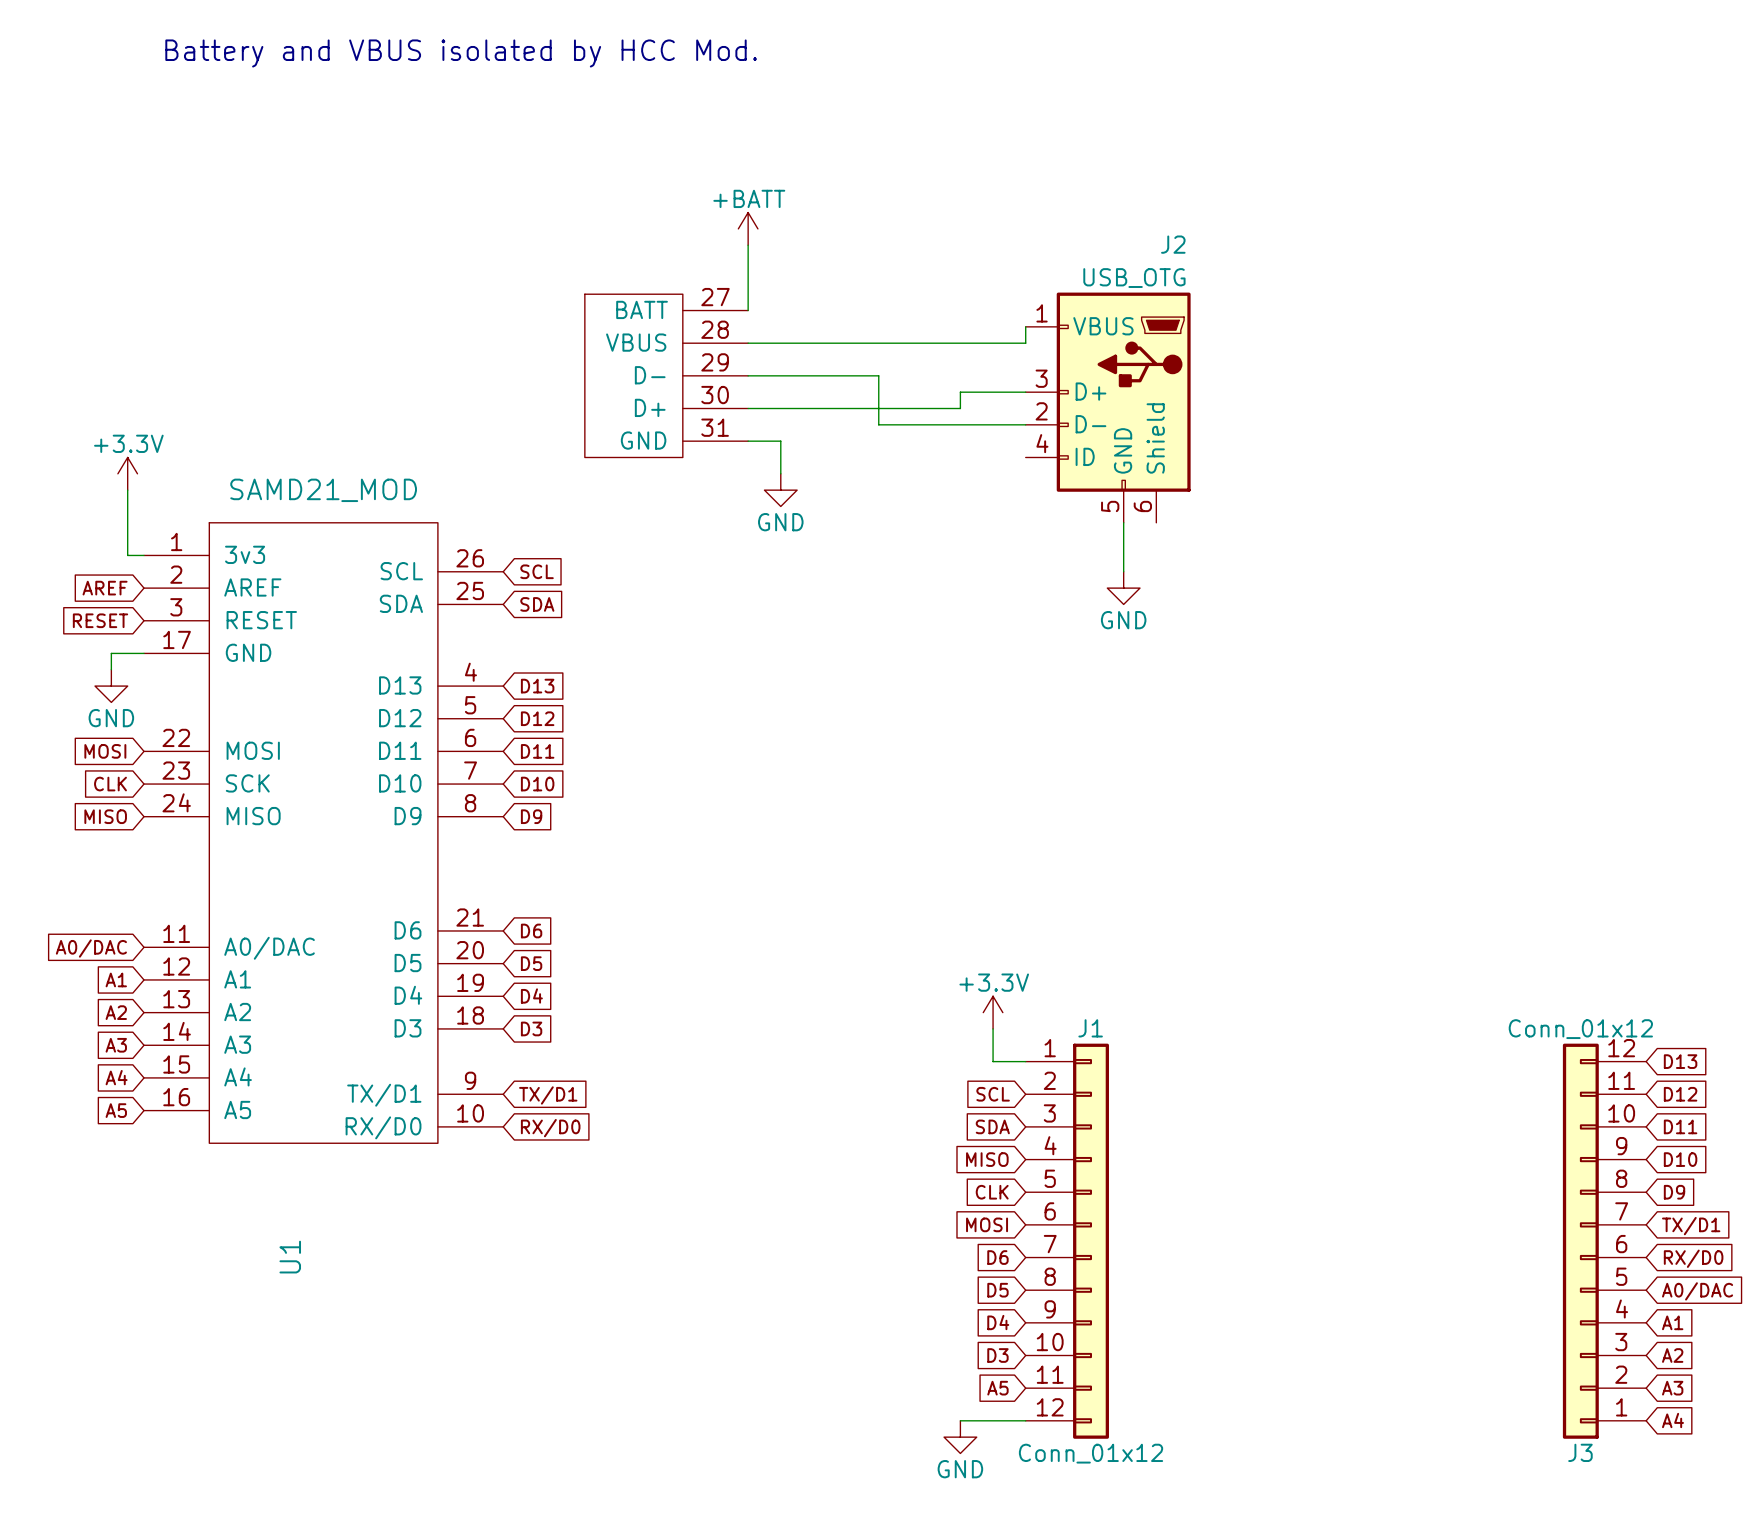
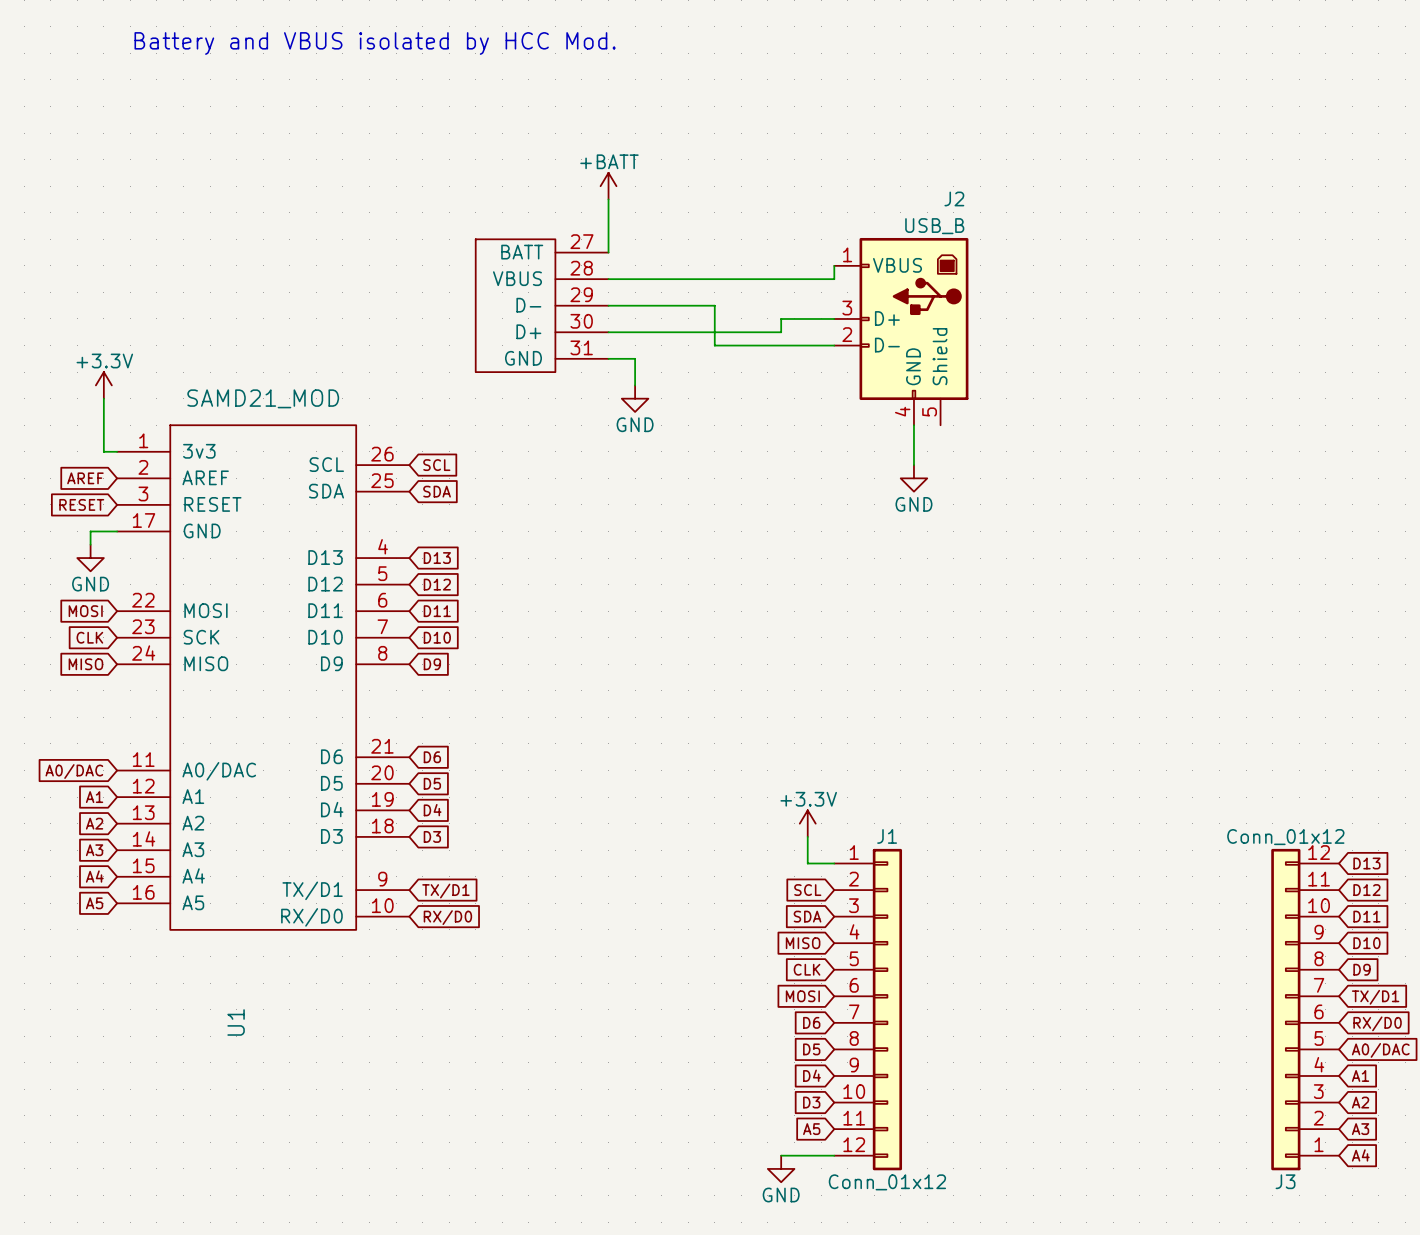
J2 value: USB_OTG (1134, 278) -> USB_B (934, 226)
J2 symbol: [1025, 292, 1191, 523] -> [834, 237, 969, 426]

